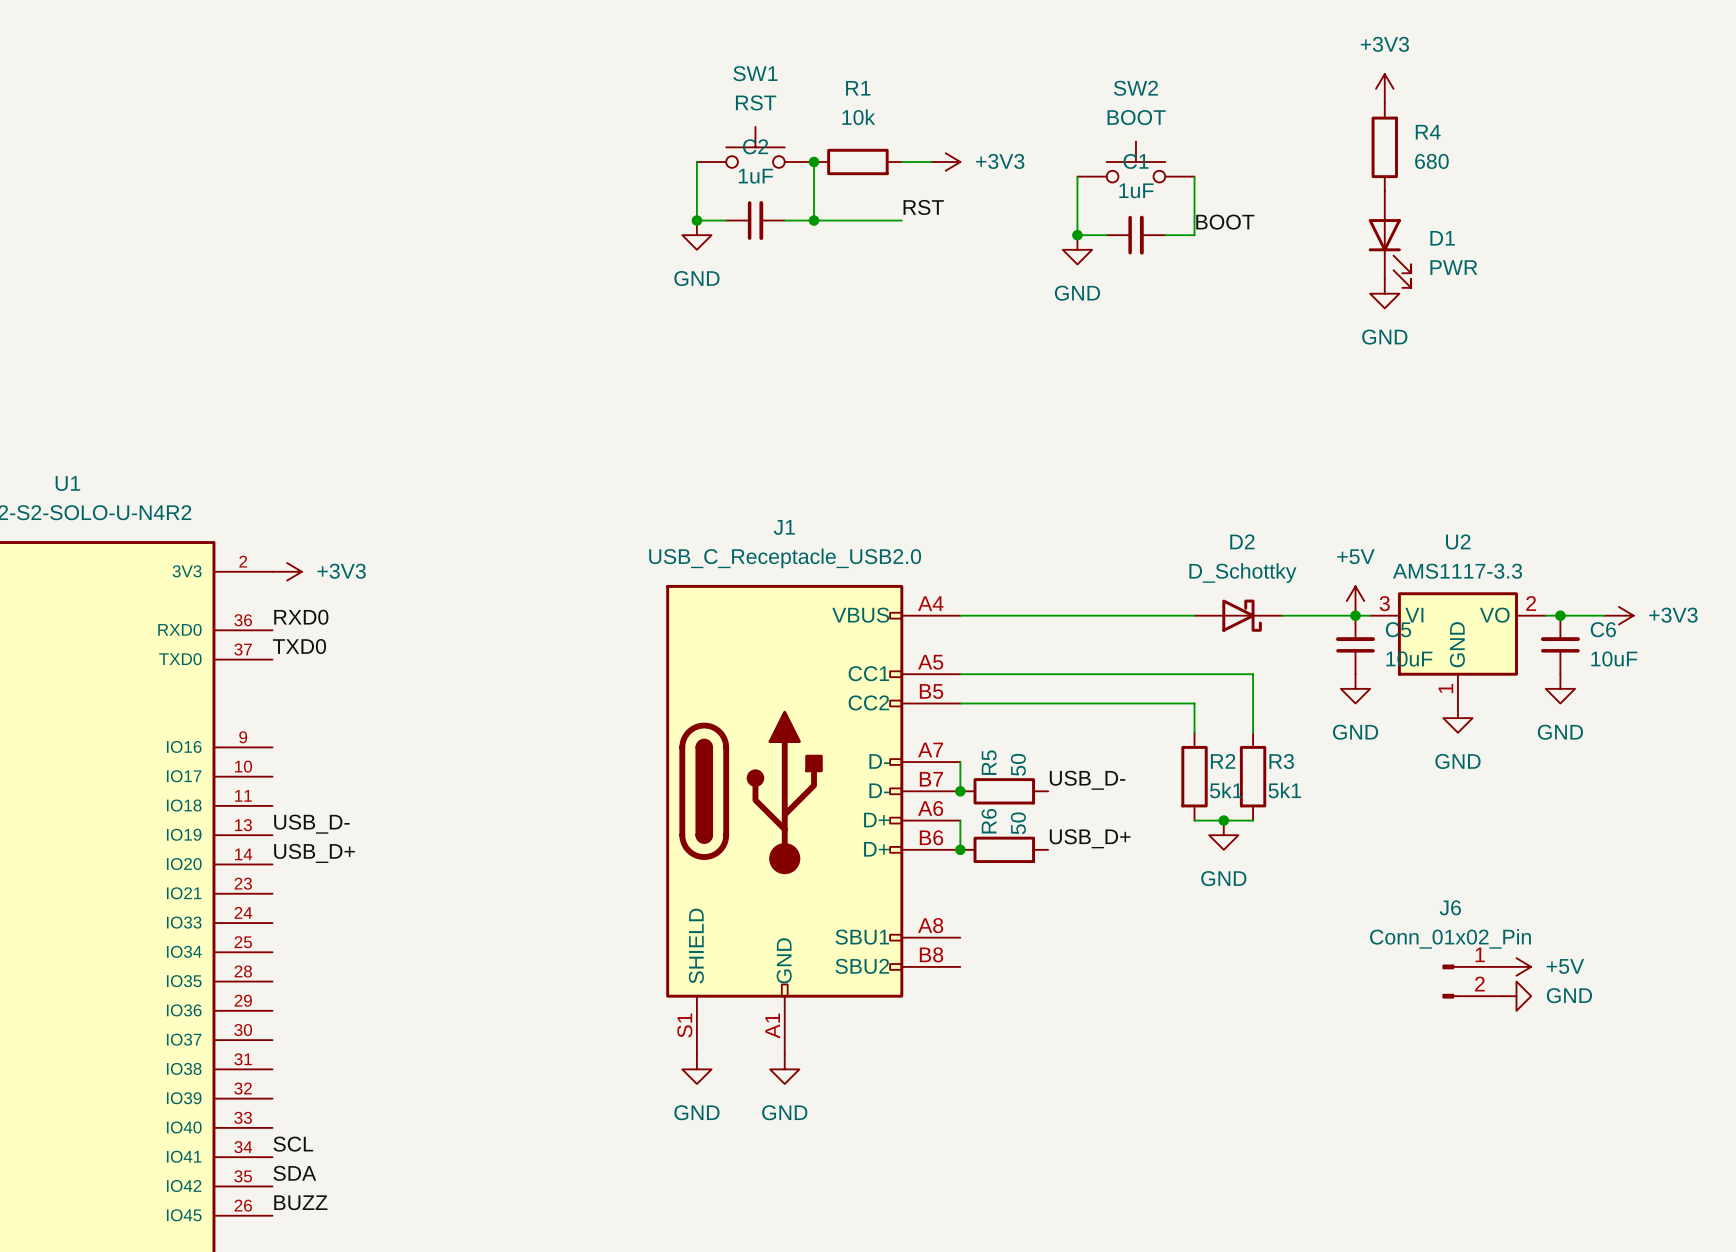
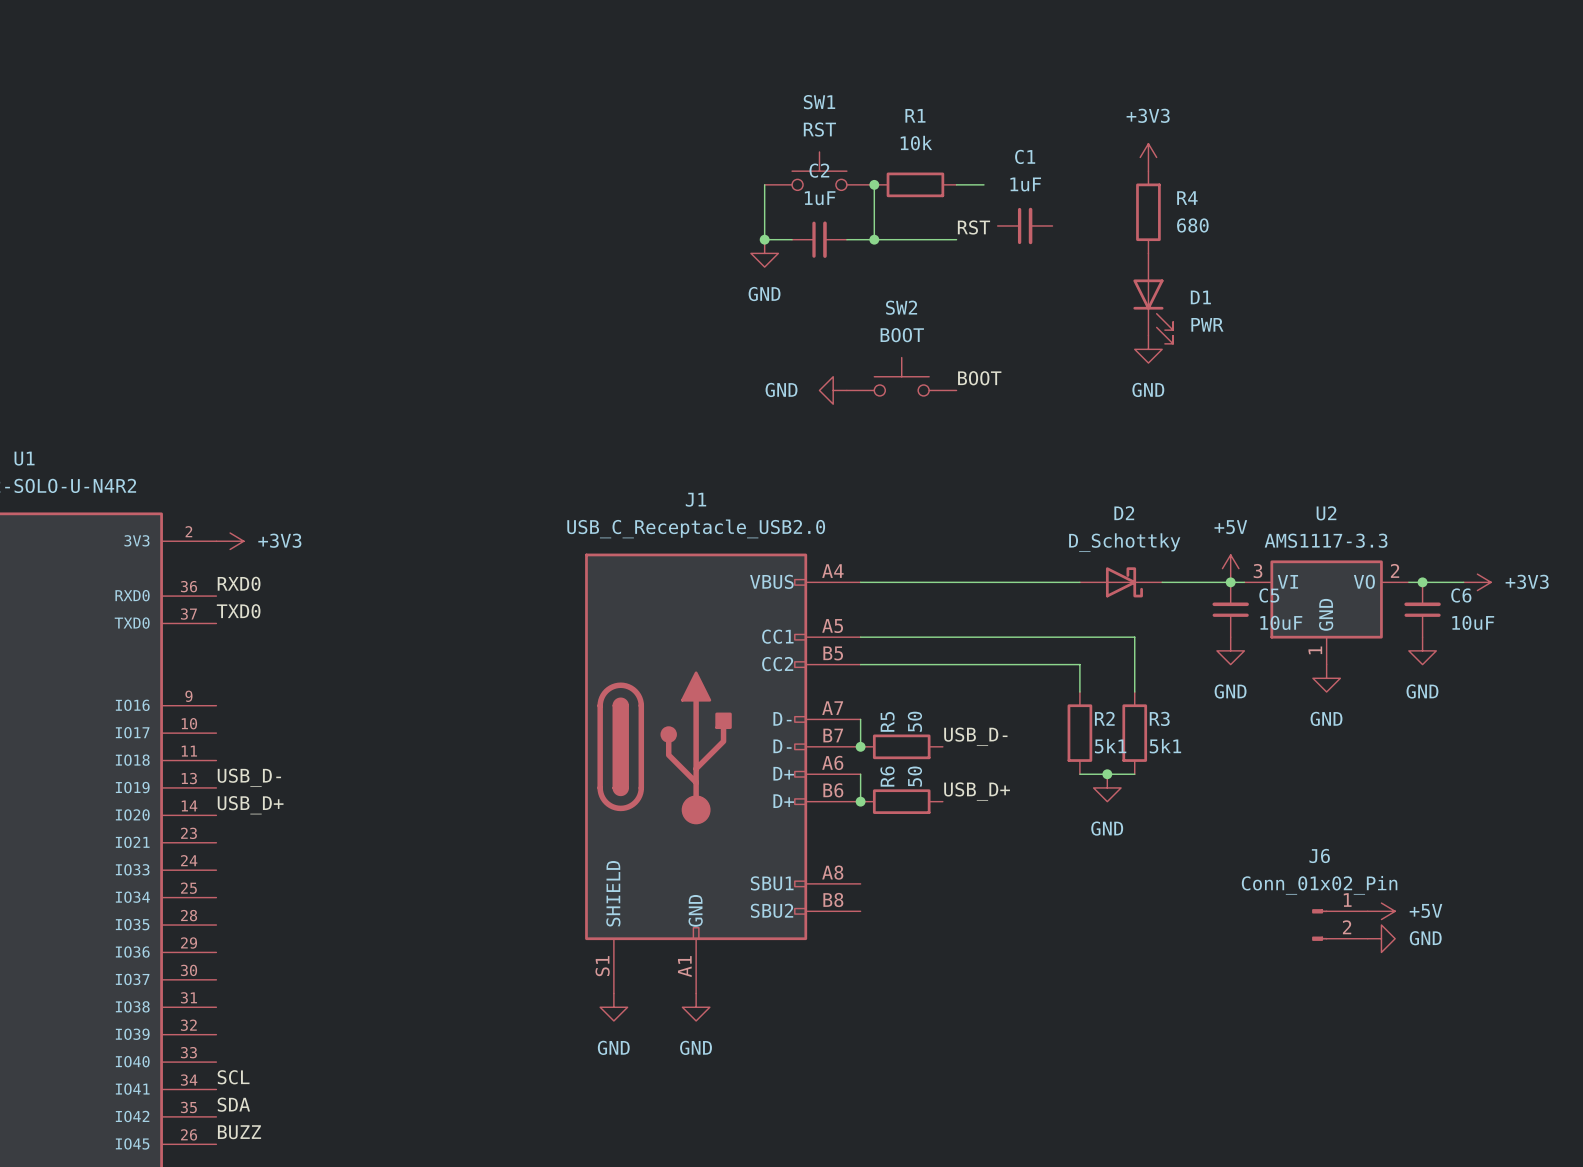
power symbol position: +3V3 (1384, 88) -> +3V3 (1148, 157)
SW1 position: (755, 147) -> (819, 171)
R4 position: (1384, 147) -> (1148, 212)
wire: (696, 162) (696, 220) (726, 220) -> (764, 184) (764, 239) (792, 239)
wire: (814, 162) (814, 220) -> (874, 184) (874, 239)
junction: (814, 162) -> none
R1 position: (857, 162) -> (915, 184)
wire: (901, 162) (931, 162) -> (956, 184) (983, 184)
power symbol: +3V3 (945, 162) -> none
SW2 position: (1135, 162) -> (901, 376)
wire: (1077, 176) (1077, 235) (1106, 235) -> none
wire: (1194, 176) (1194, 235) (1165, 235) -> none
junction: none -> (874, 184)
label position: RST (923, 207) -> RST (973, 227)
junction: (696, 220) -> none
C2 position: (755, 220) -> (819, 239)
wire: (784, 220) (901, 220) -> (846, 239) (956, 239)
junction: (814, 220) -> none
label position: BOOT (1225, 222) -> BOOT (979, 378)
power symbol: GND (696, 235) -> none
junction: (1077, 235) -> none
D1 position: (1389, 239) -> (1153, 298)
junction: none -> (764, 239)
junction: none -> (874, 239)
power symbol: GND (1077, 249) -> none
power symbol: none -> GND (764, 253)
power symbol: GND (1384, 293) -> none
power symbol: none -> GND (1148, 349)
power symbol: none -> GND (833, 390)

